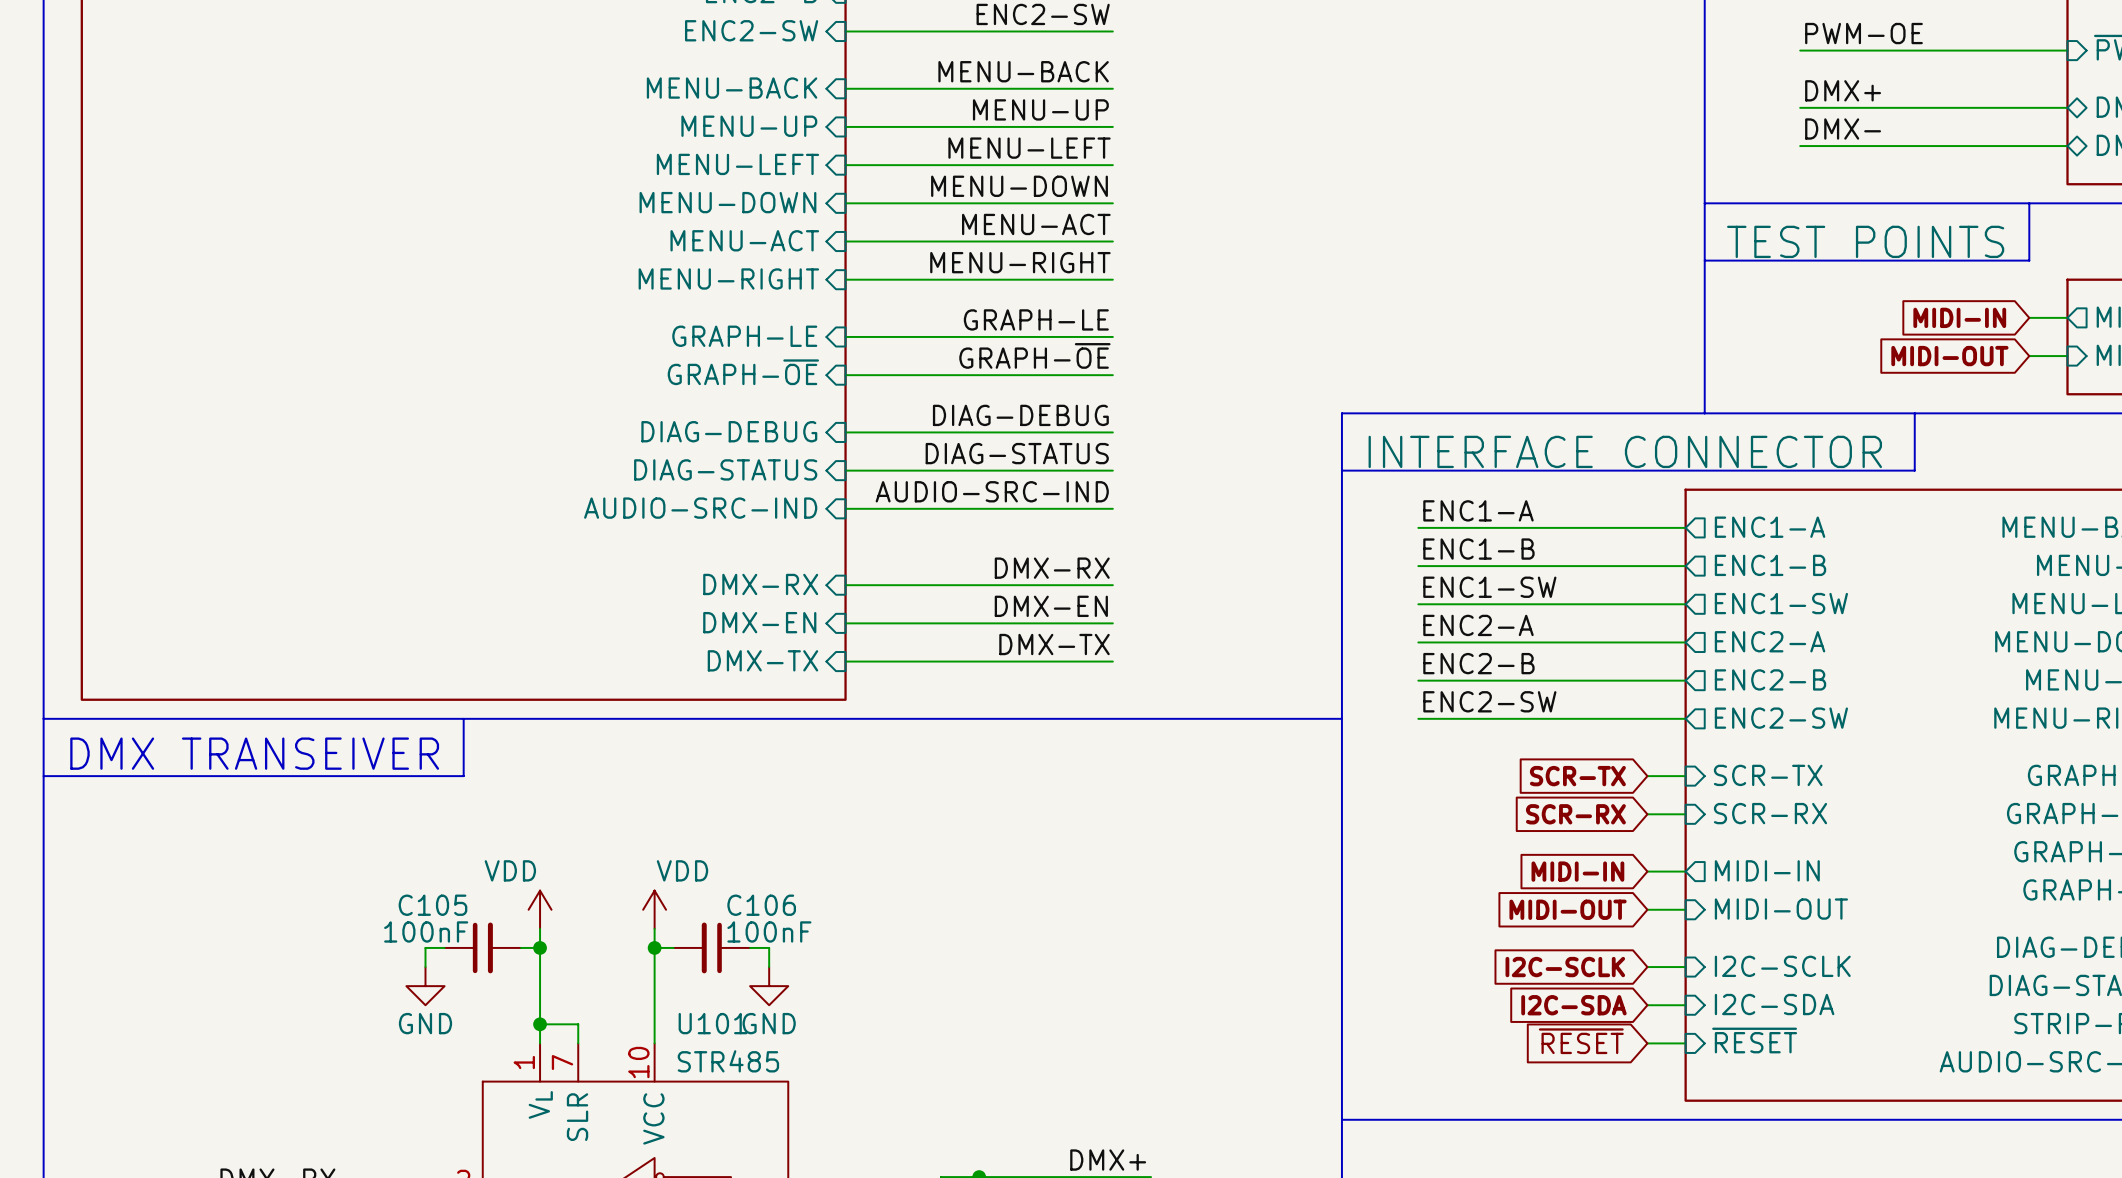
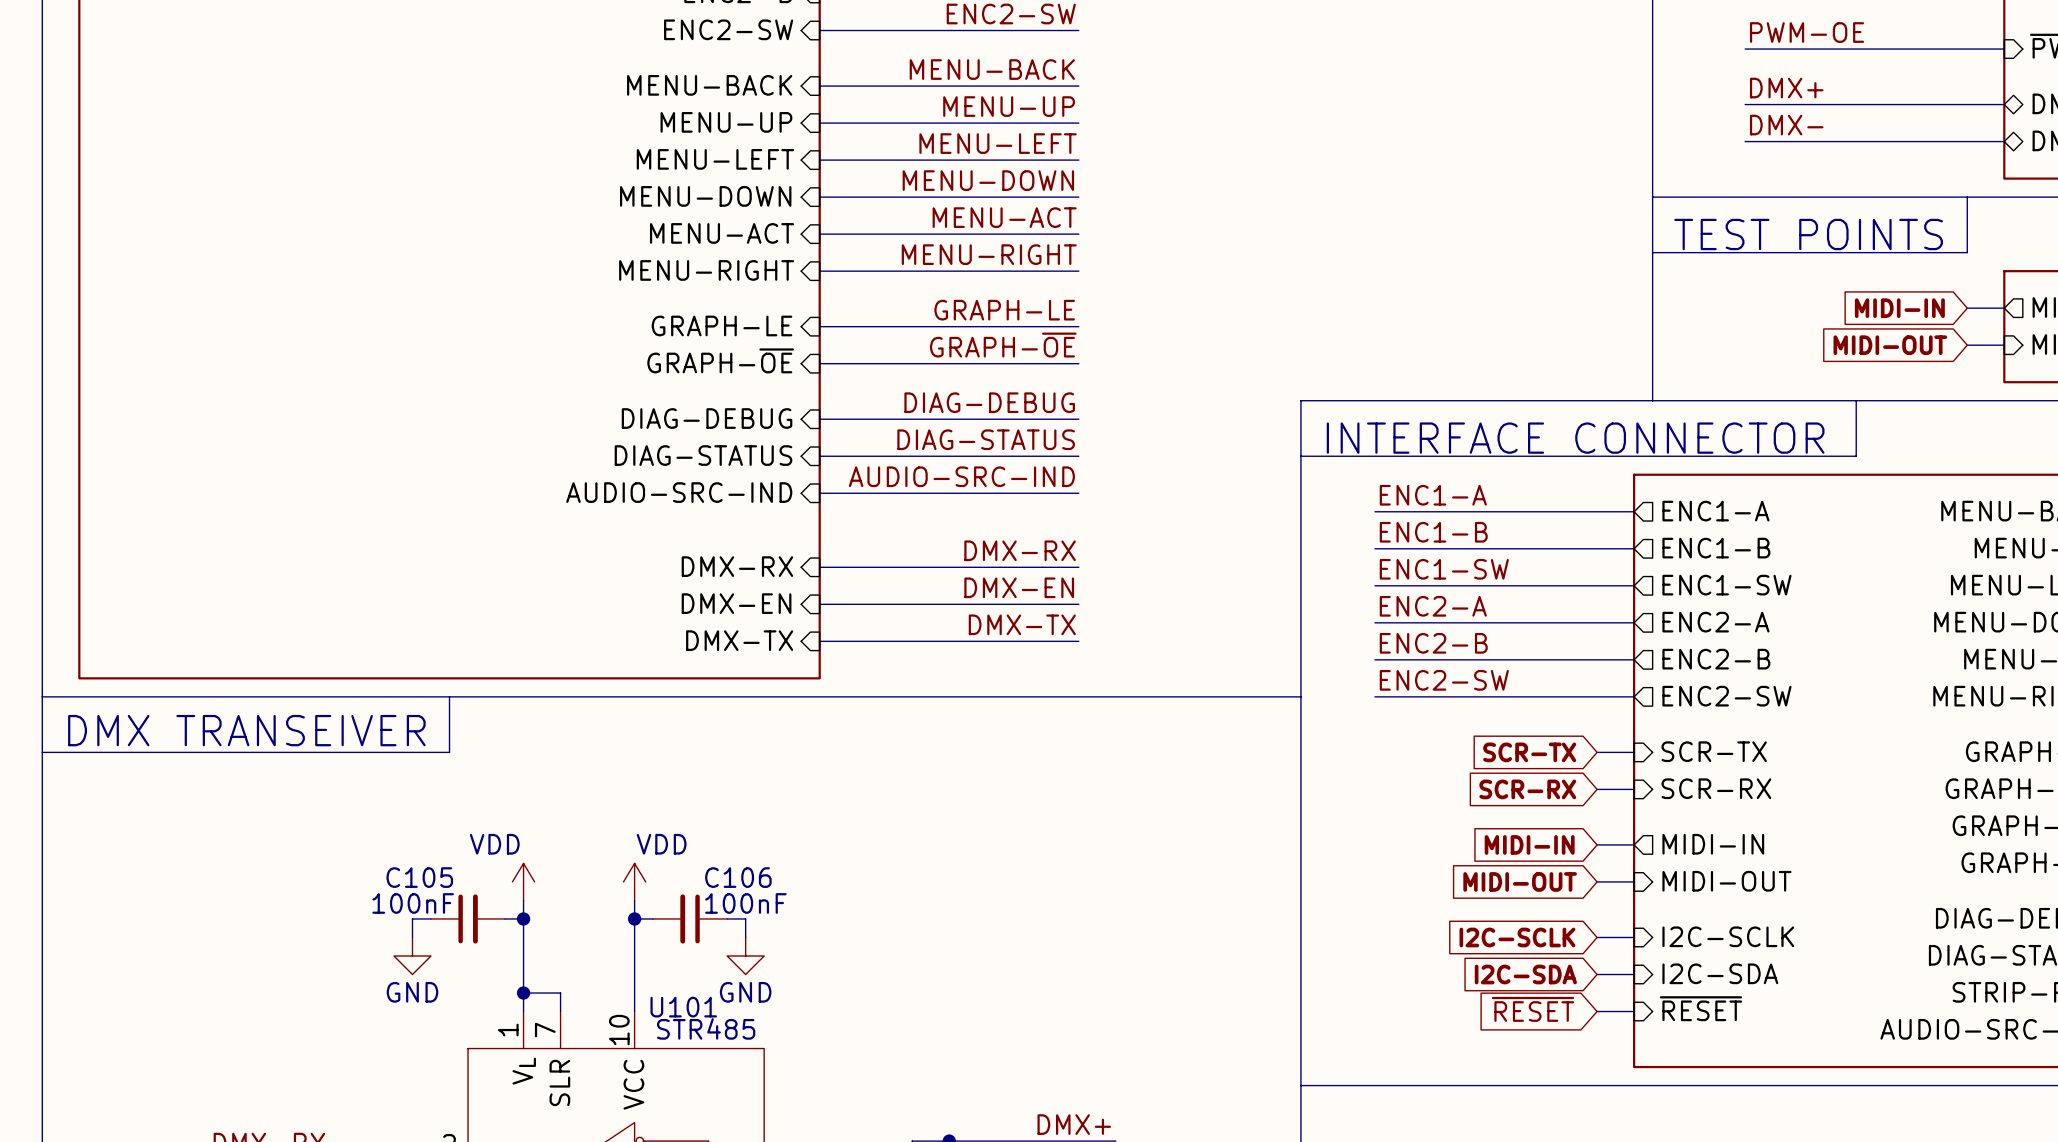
U101 name position: U101 (712, 1023) -> U101 (683, 1007)

